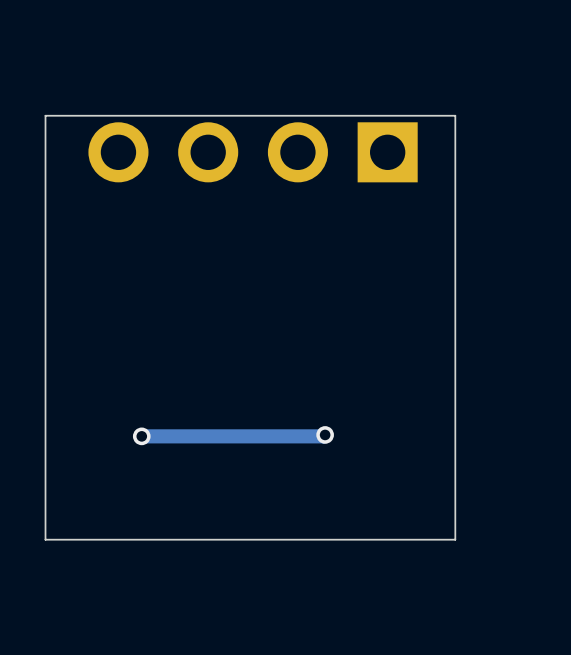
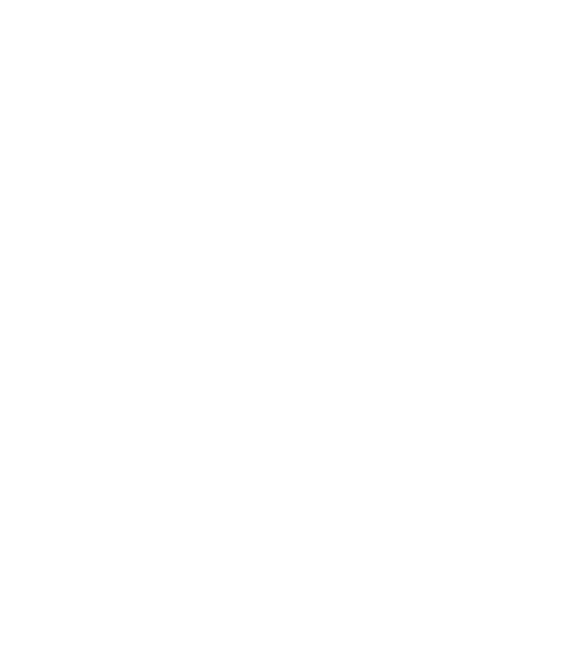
board edge: (455, 115) (455, 539) (45, 539) (45, 115) (455, 115) -> none
part: (253, 152) -> none
track: (325, 434) (141, 436) -> none
via: (325, 434) -> none
via: (141, 436) -> none

